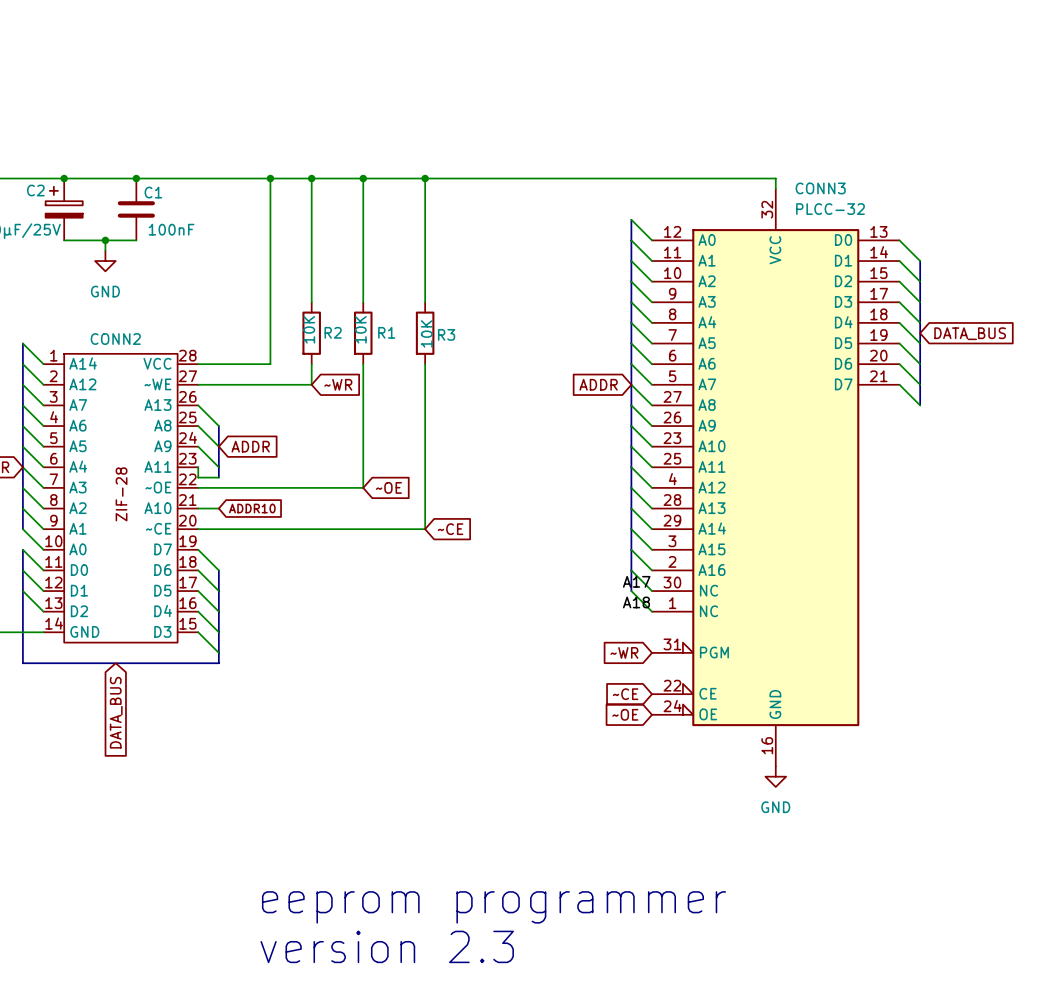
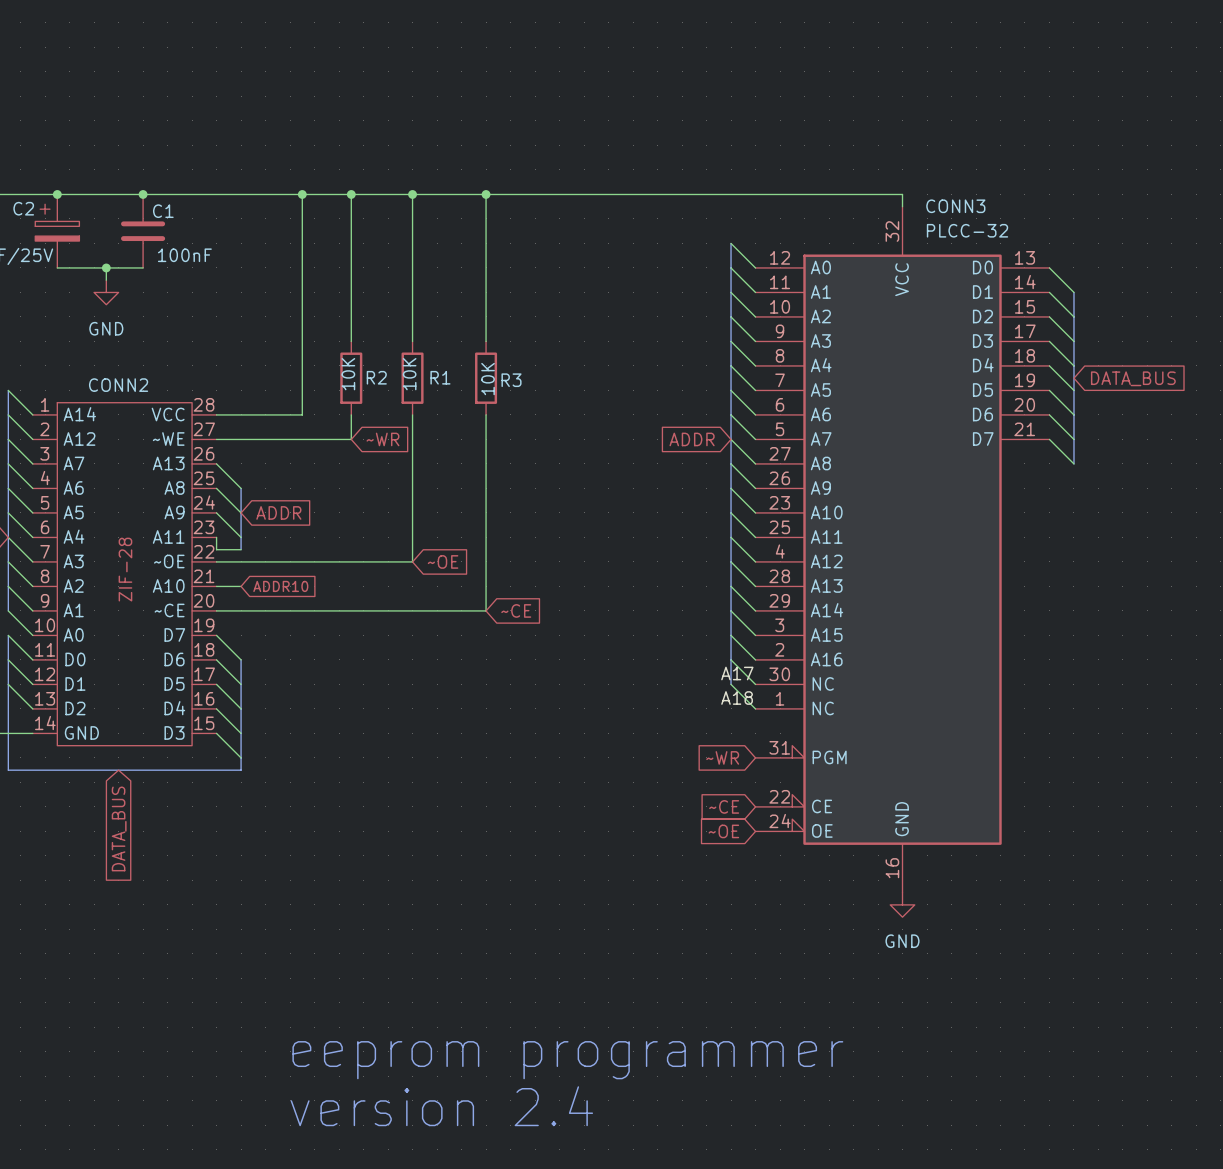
text: version 2.3 (387, 946) -> version 2.4 (441, 1106)

